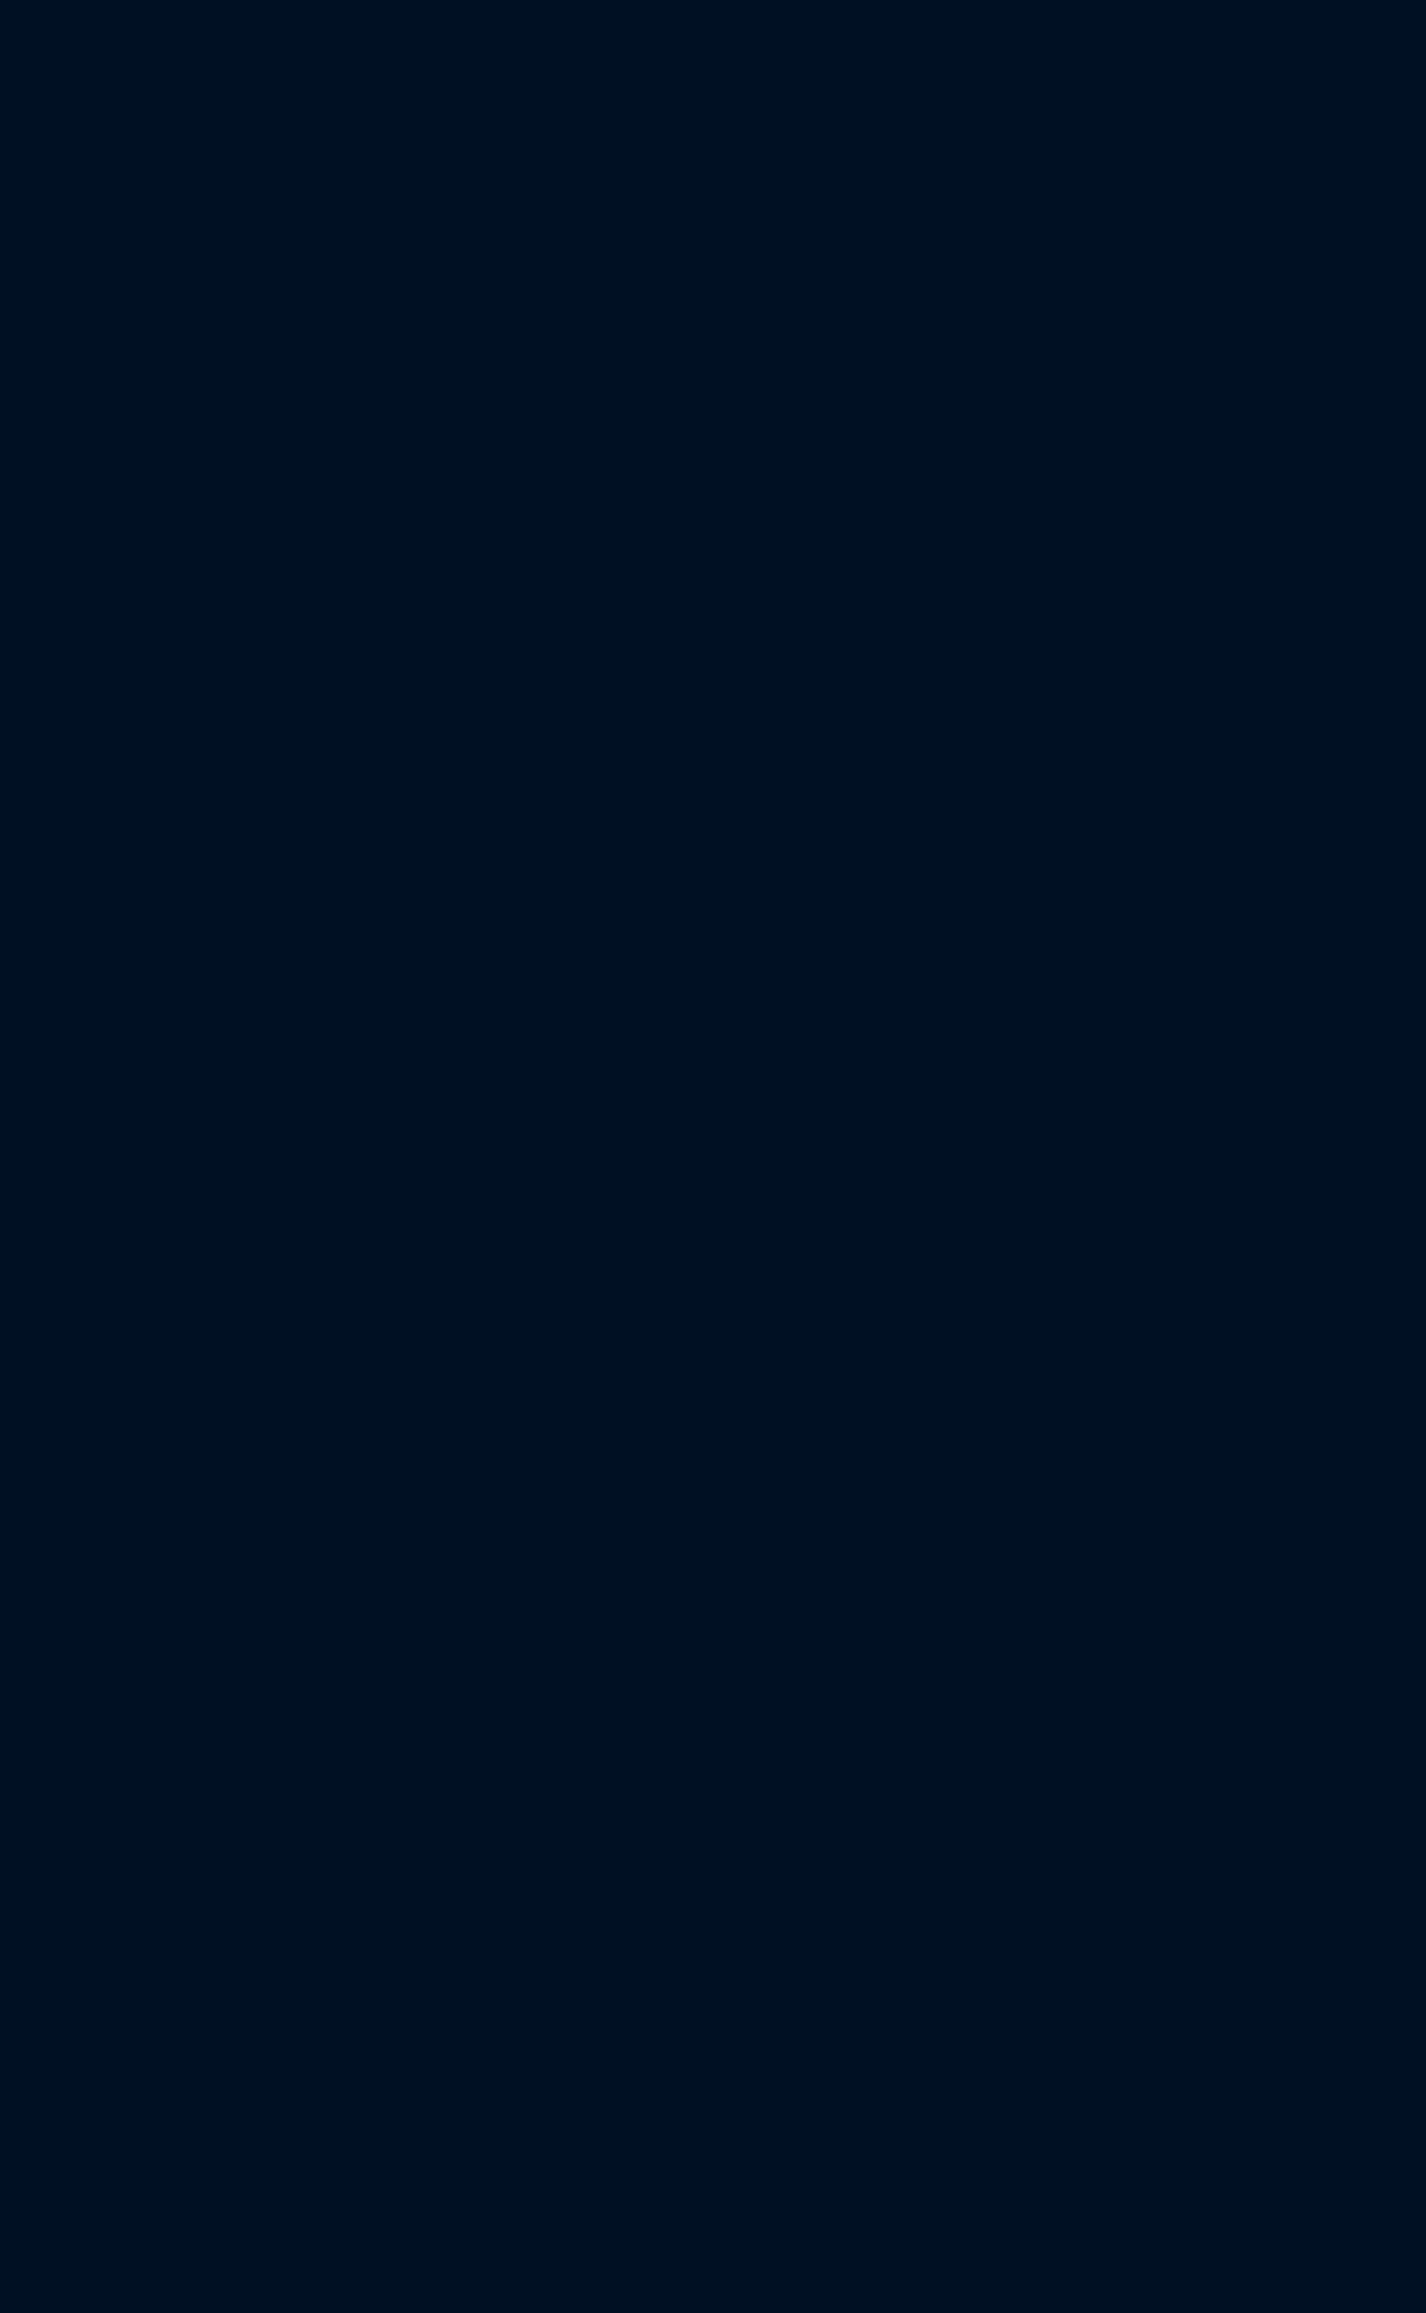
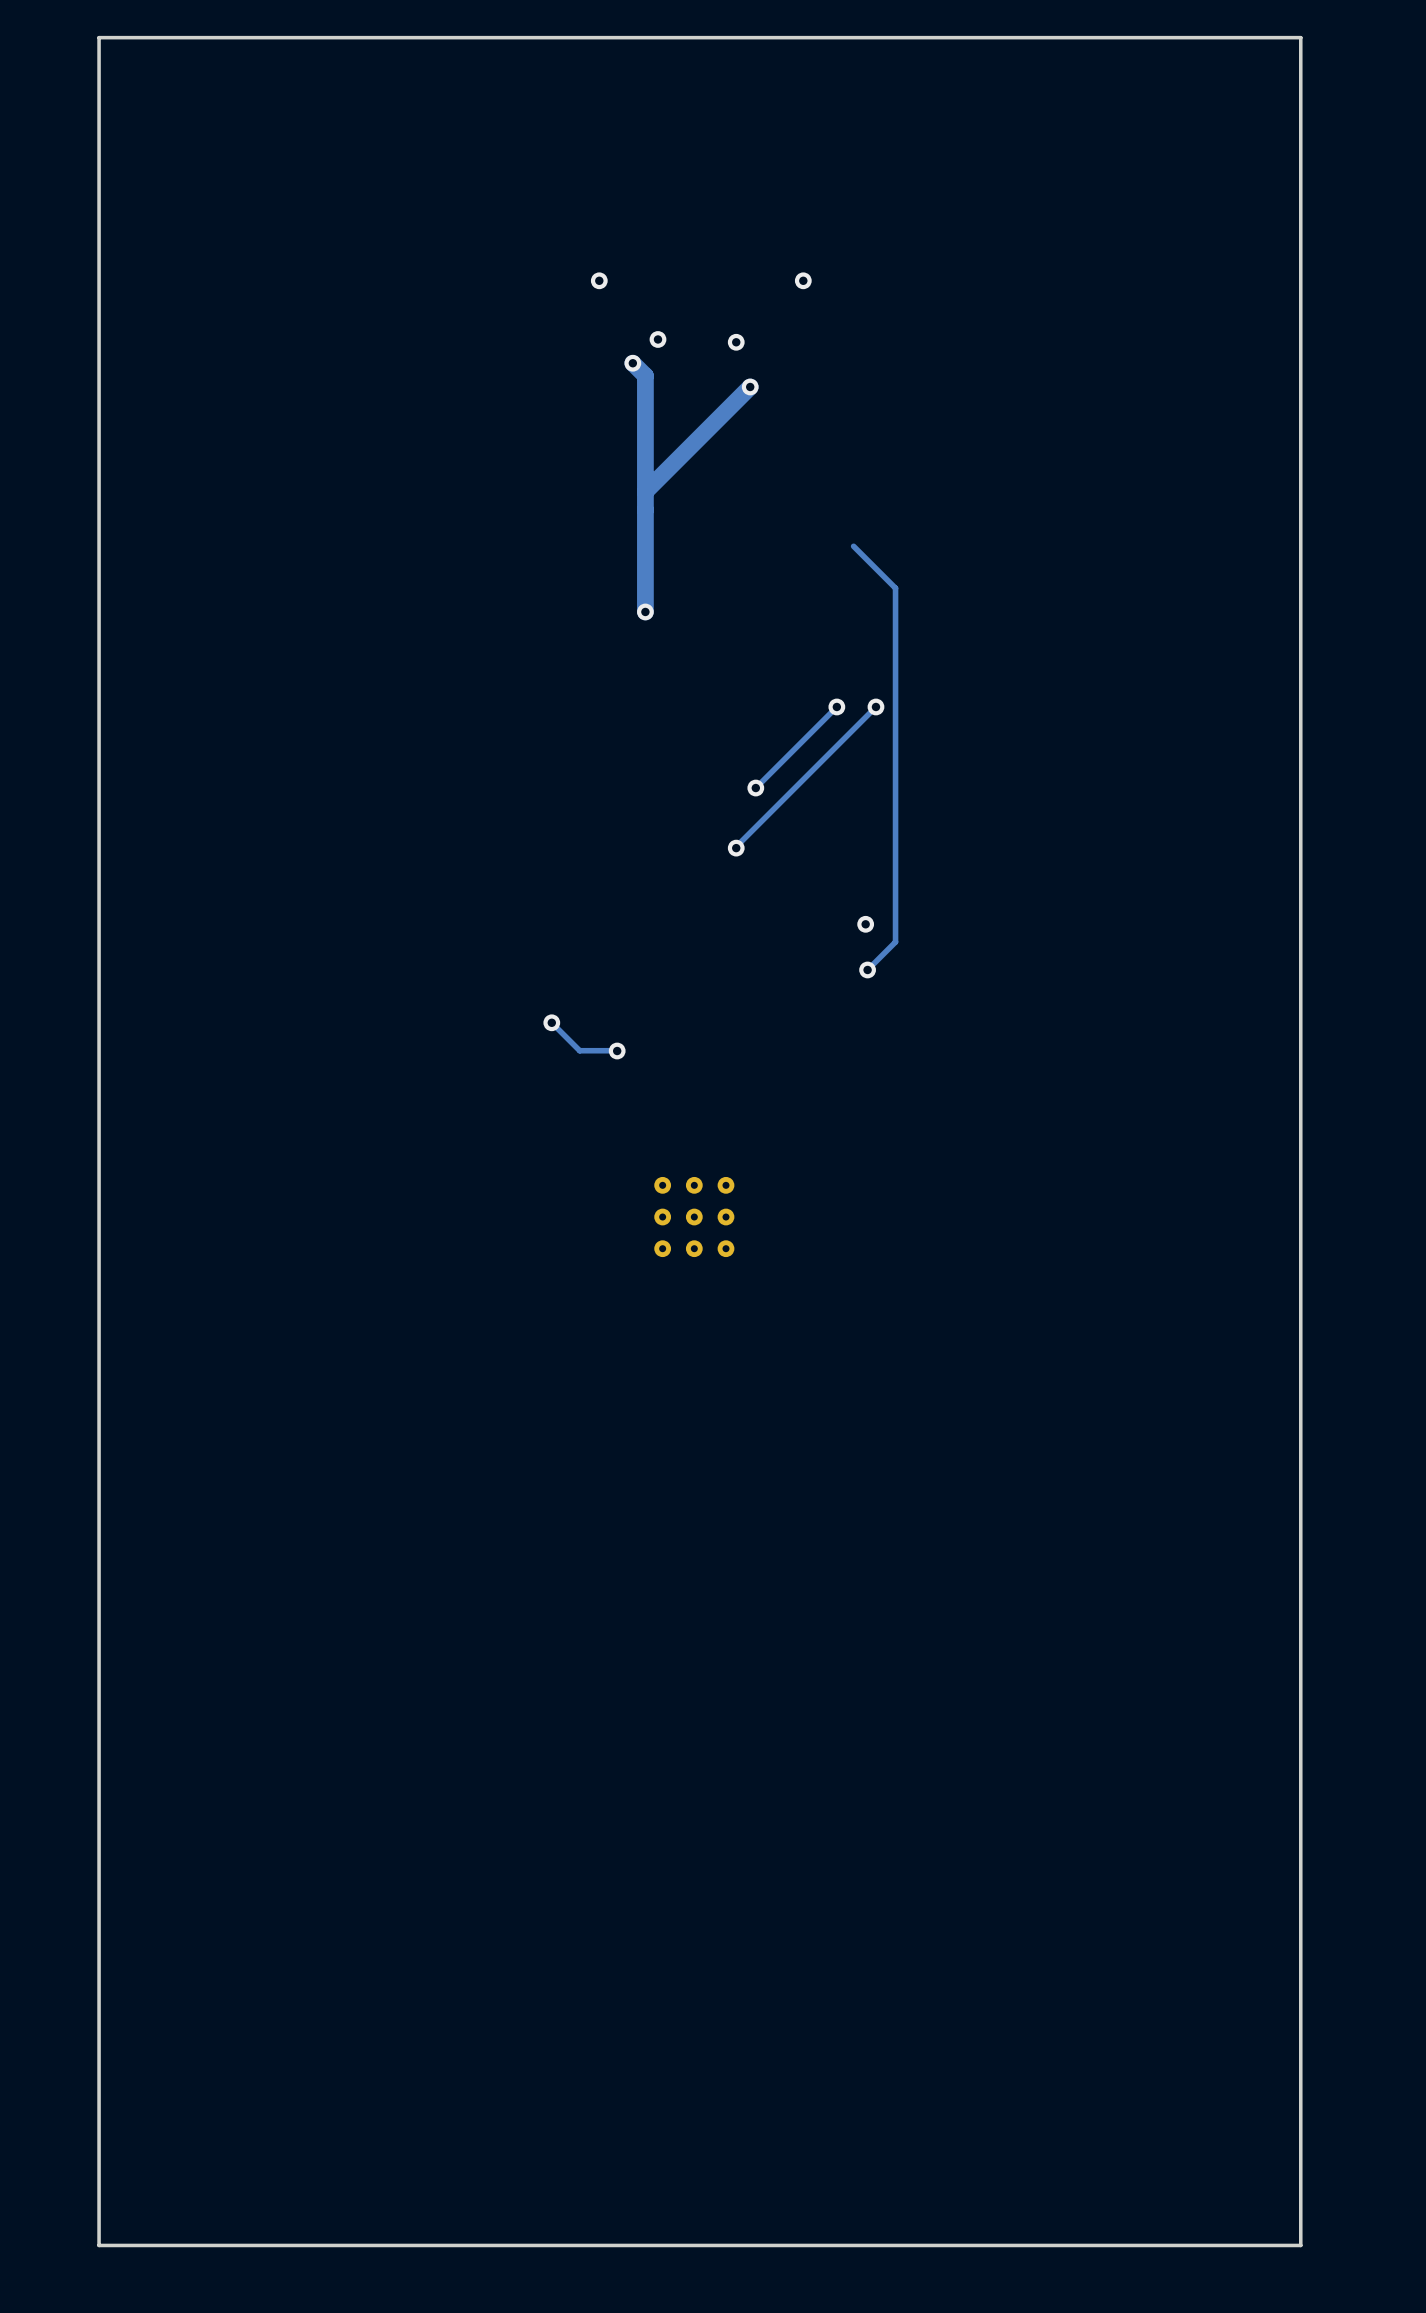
board edge: none -> (1300, 37) (99, 37) (99, 2245) (1300, 2245) (1300, 37)
via: none -> (599, 280)
via: none -> (803, 280)
via: none -> (657, 339)
via: none -> (736, 342)
track: none -> (632, 363) (645, 375) (645, 611)
via: none -> (632, 363)
track: none -> (750, 386) (645, 491) (645, 509)
via: none -> (750, 386)
track: none -> (853, 546) (895, 588) (895, 942) (867, 969)
via: none -> (645, 611)
track: none -> (836, 706) (755, 788)
via: none -> (836, 706)
track: none -> (875, 706) (736, 848)
via: none -> (875, 706)
via: none -> (755, 788)
via: none -> (736, 848)
via: none -> (865, 924)
via: none -> (867, 969)
track: none -> (551, 1022) (579, 1050) (616, 1050)
via: none -> (551, 1022)
via: none -> (617, 1051)
part: none -> (694, 1217)

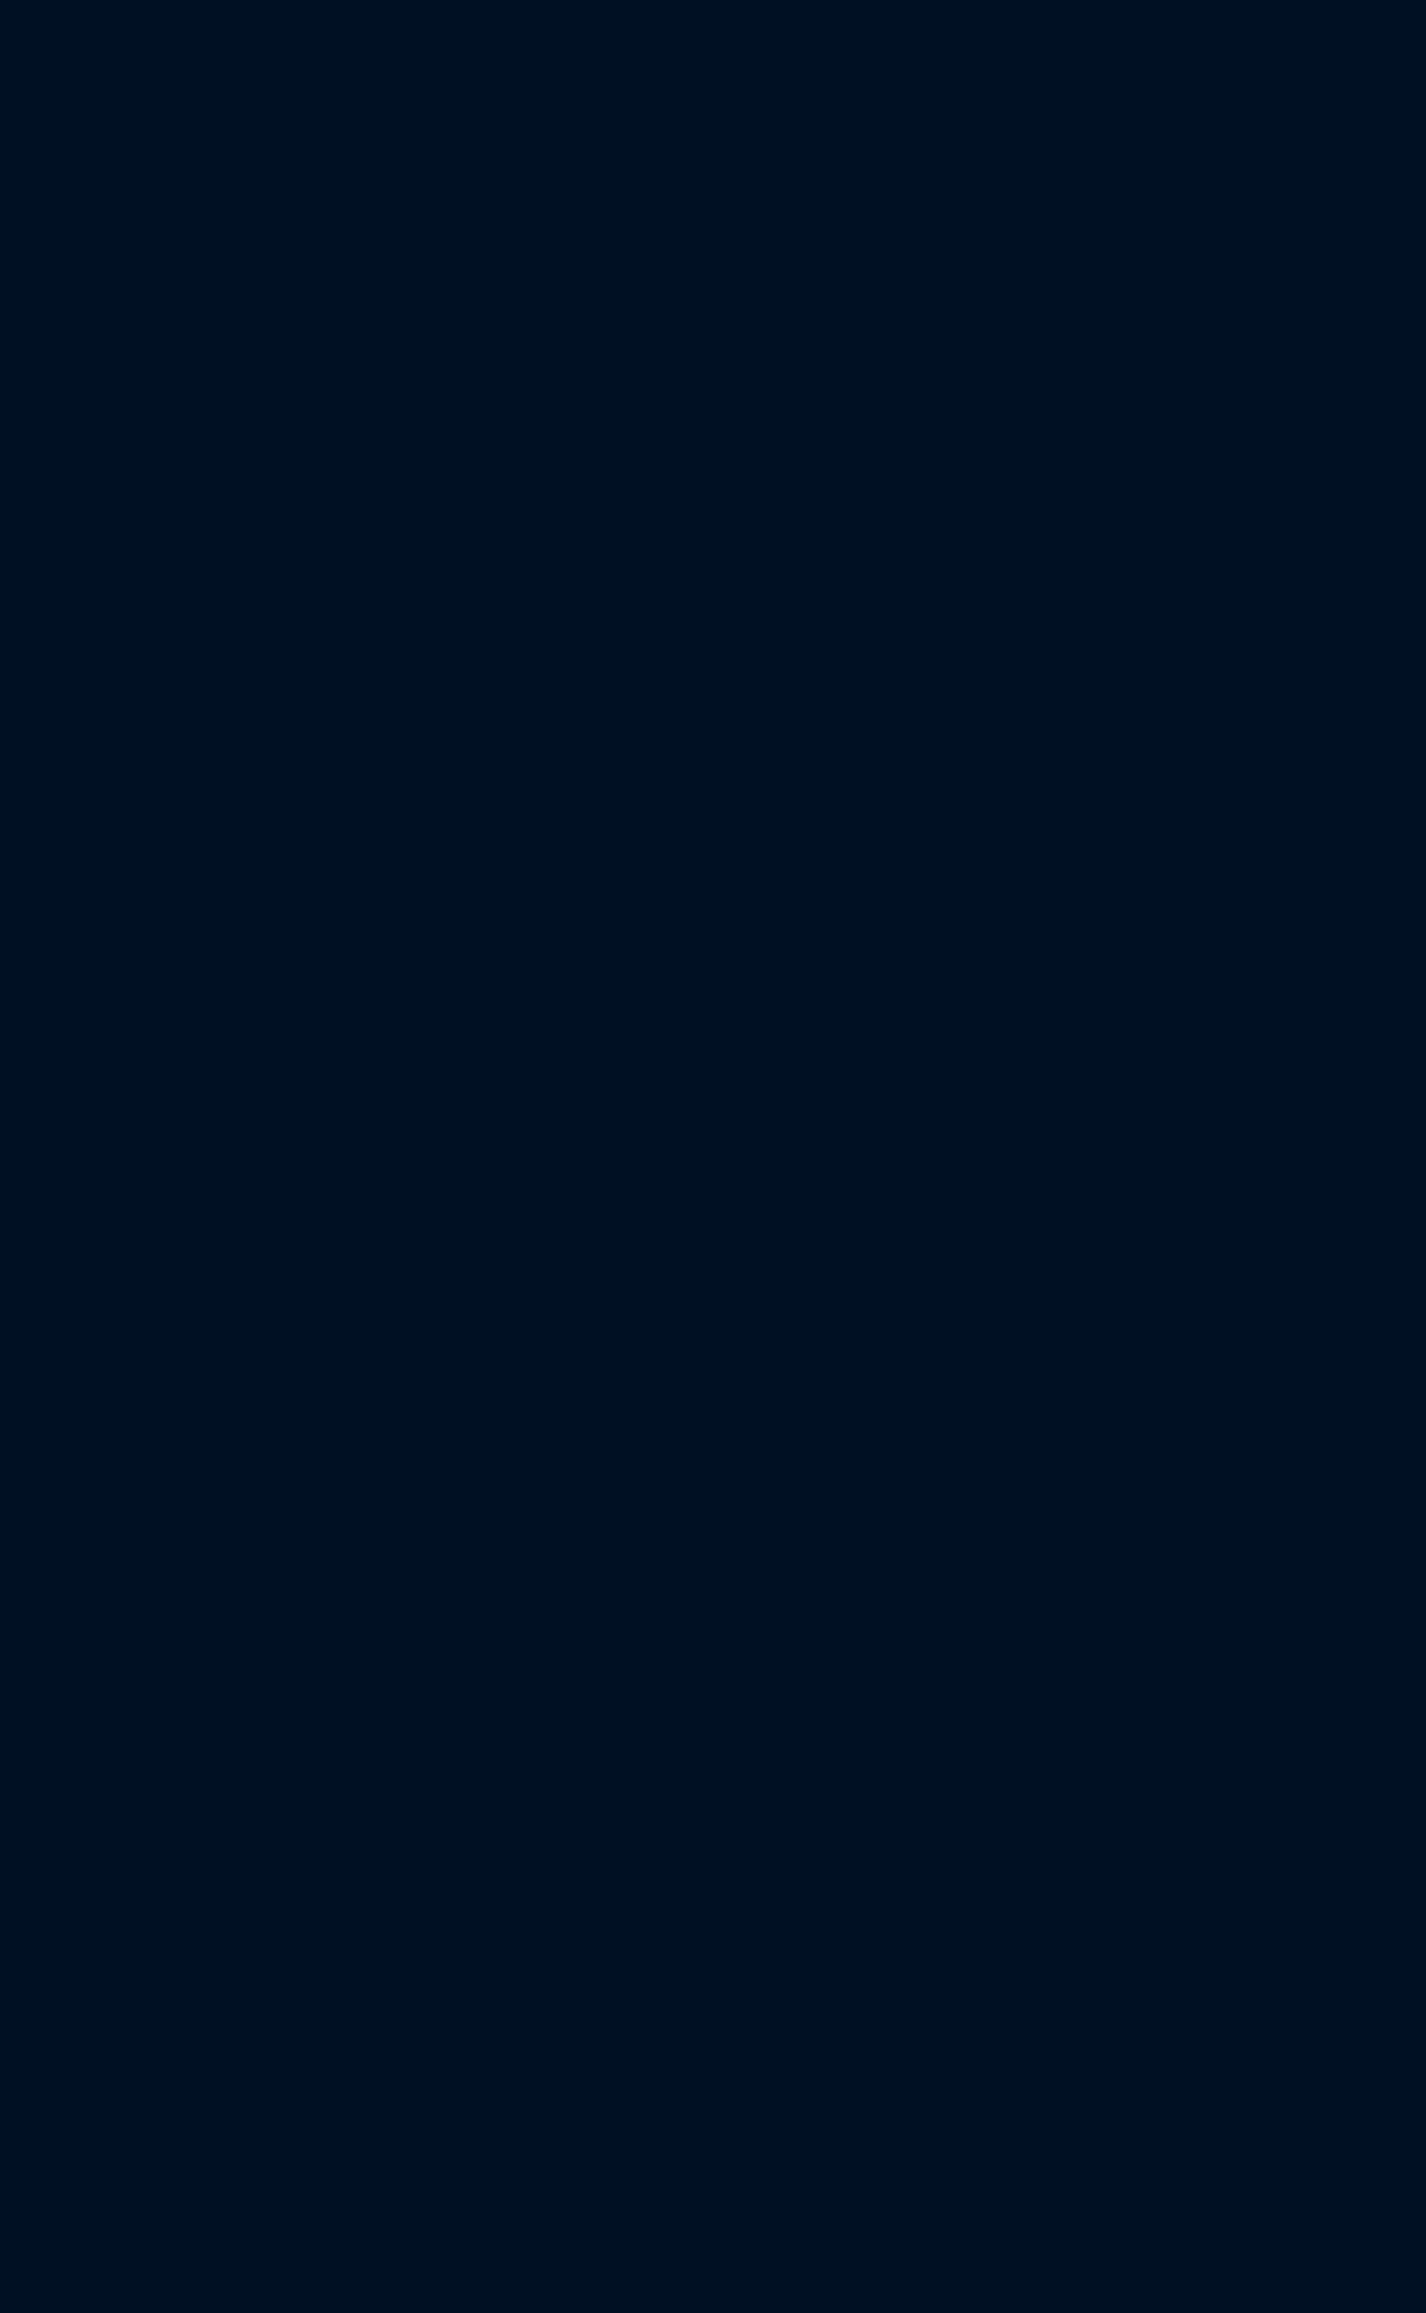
board edge: (1300, 37) (99, 37) (99, 2245) (1300, 2245) (1300, 37) -> none
via: (599, 280) -> none
via: (803, 280) -> none
via: (657, 339) -> none
via: (736, 342) -> none
track: (632, 363) (645, 375) (645, 611) -> none
via: (632, 363) -> none
track: (750, 386) (645, 491) (645, 509) -> none
via: (750, 386) -> none
track: (853, 546) (895, 588) (895, 942) (867, 969) -> none
via: (645, 611) -> none
track: (836, 706) (755, 788) -> none
via: (836, 706) -> none
track: (875, 706) (736, 848) -> none
via: (875, 706) -> none
via: (755, 788) -> none
via: (736, 848) -> none
via: (865, 924) -> none
via: (867, 969) -> none
track: (551, 1022) (579, 1050) (616, 1050) -> none
via: (551, 1022) -> none
via: (617, 1051) -> none
part: (694, 1217) -> none

